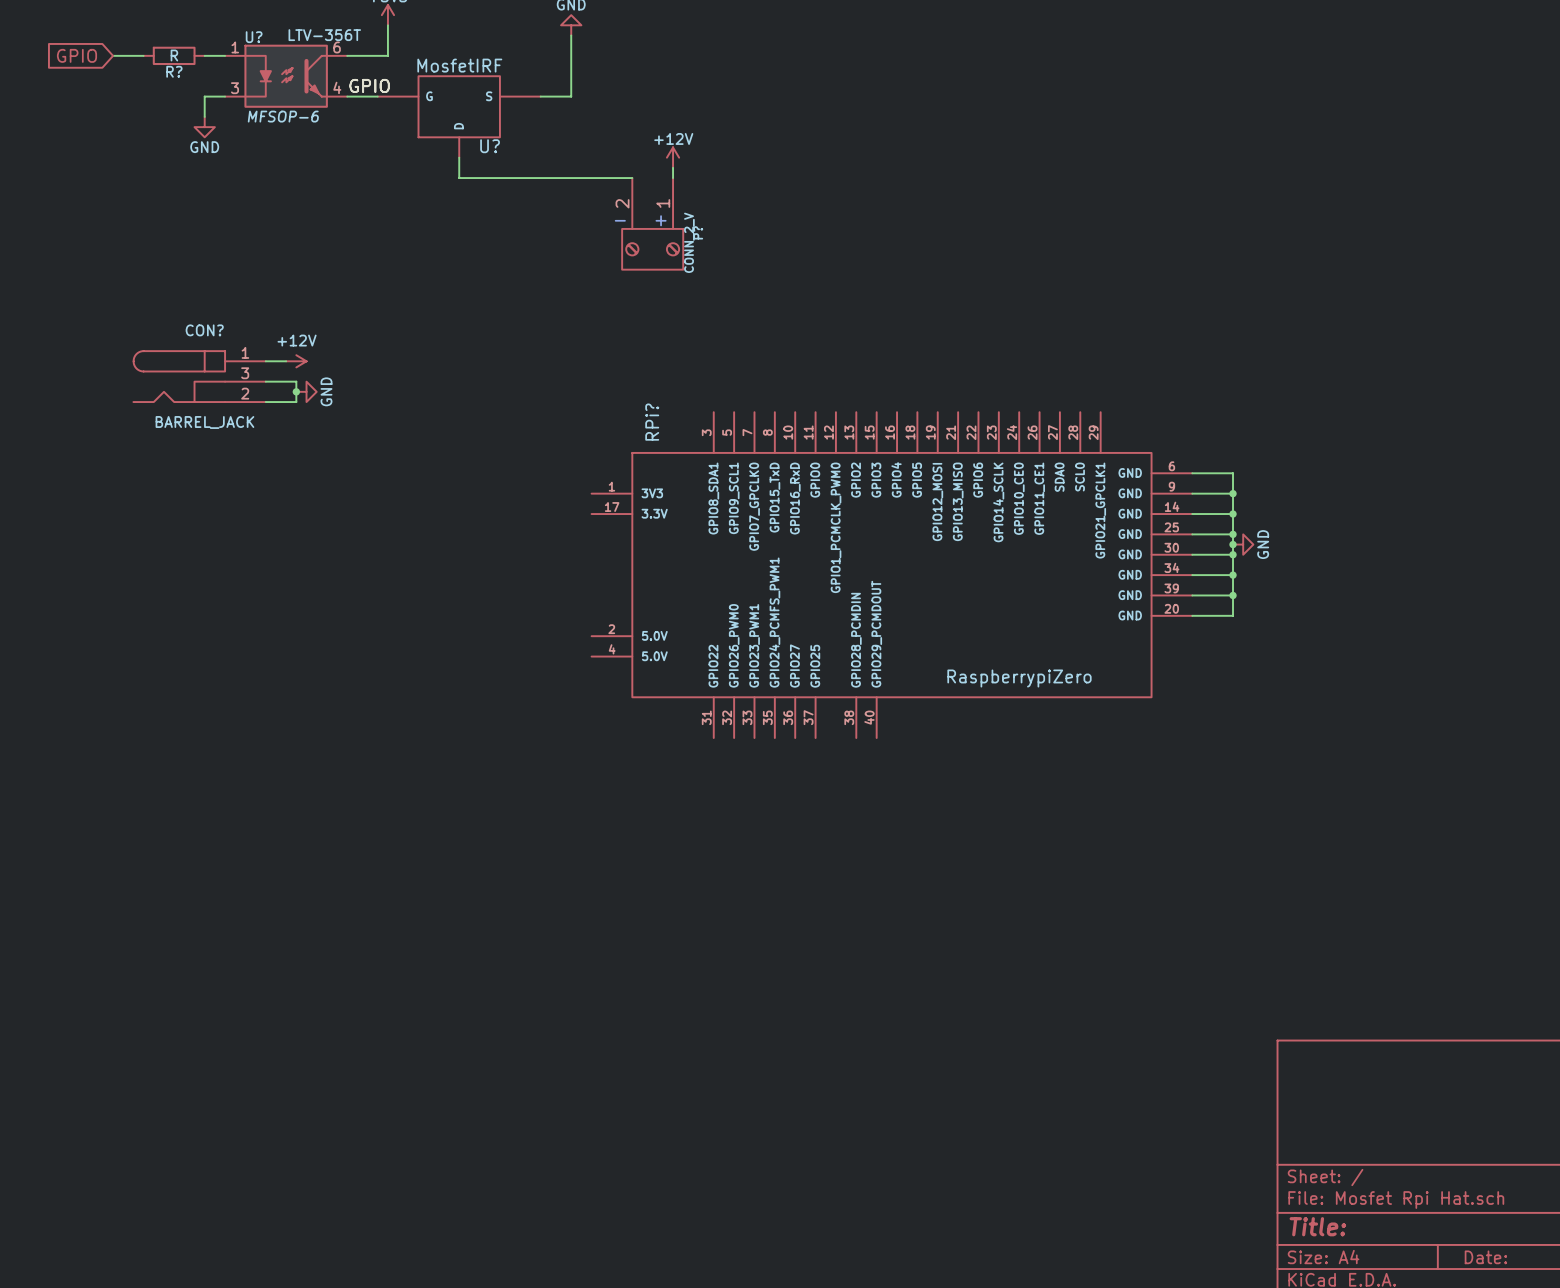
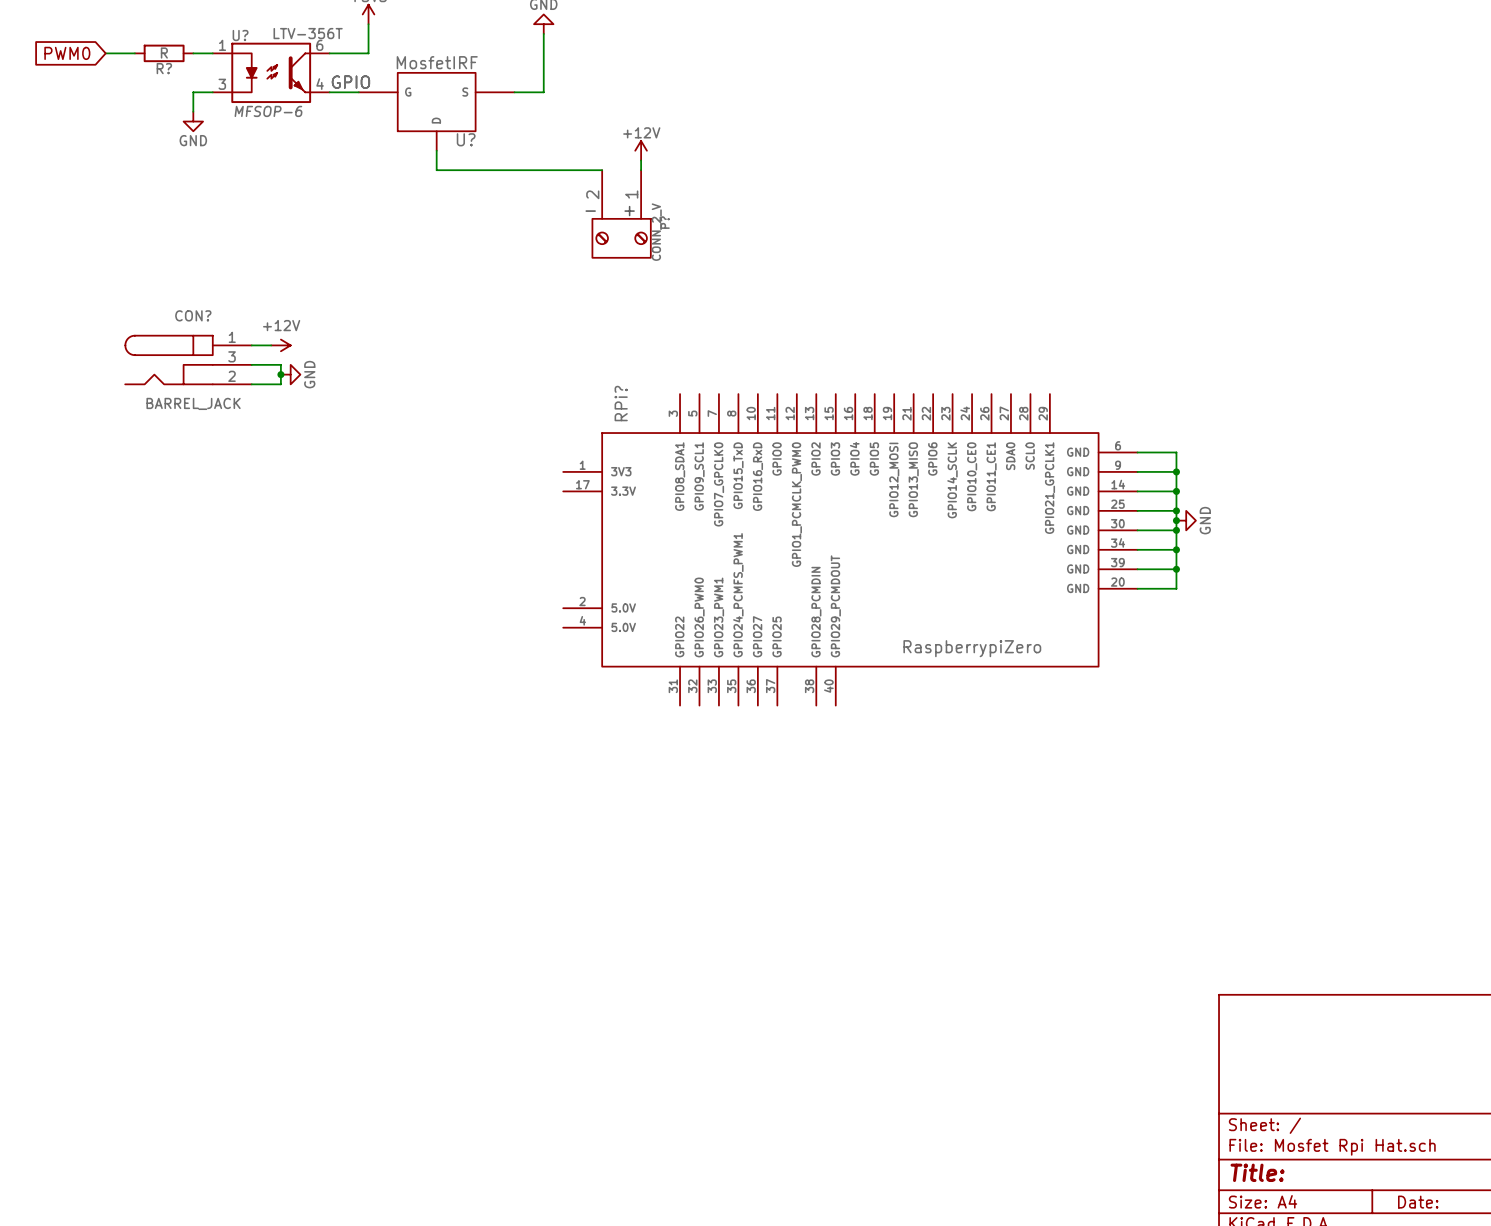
global label: GPIO (76, 55) -> PWM0 (67, 53)

